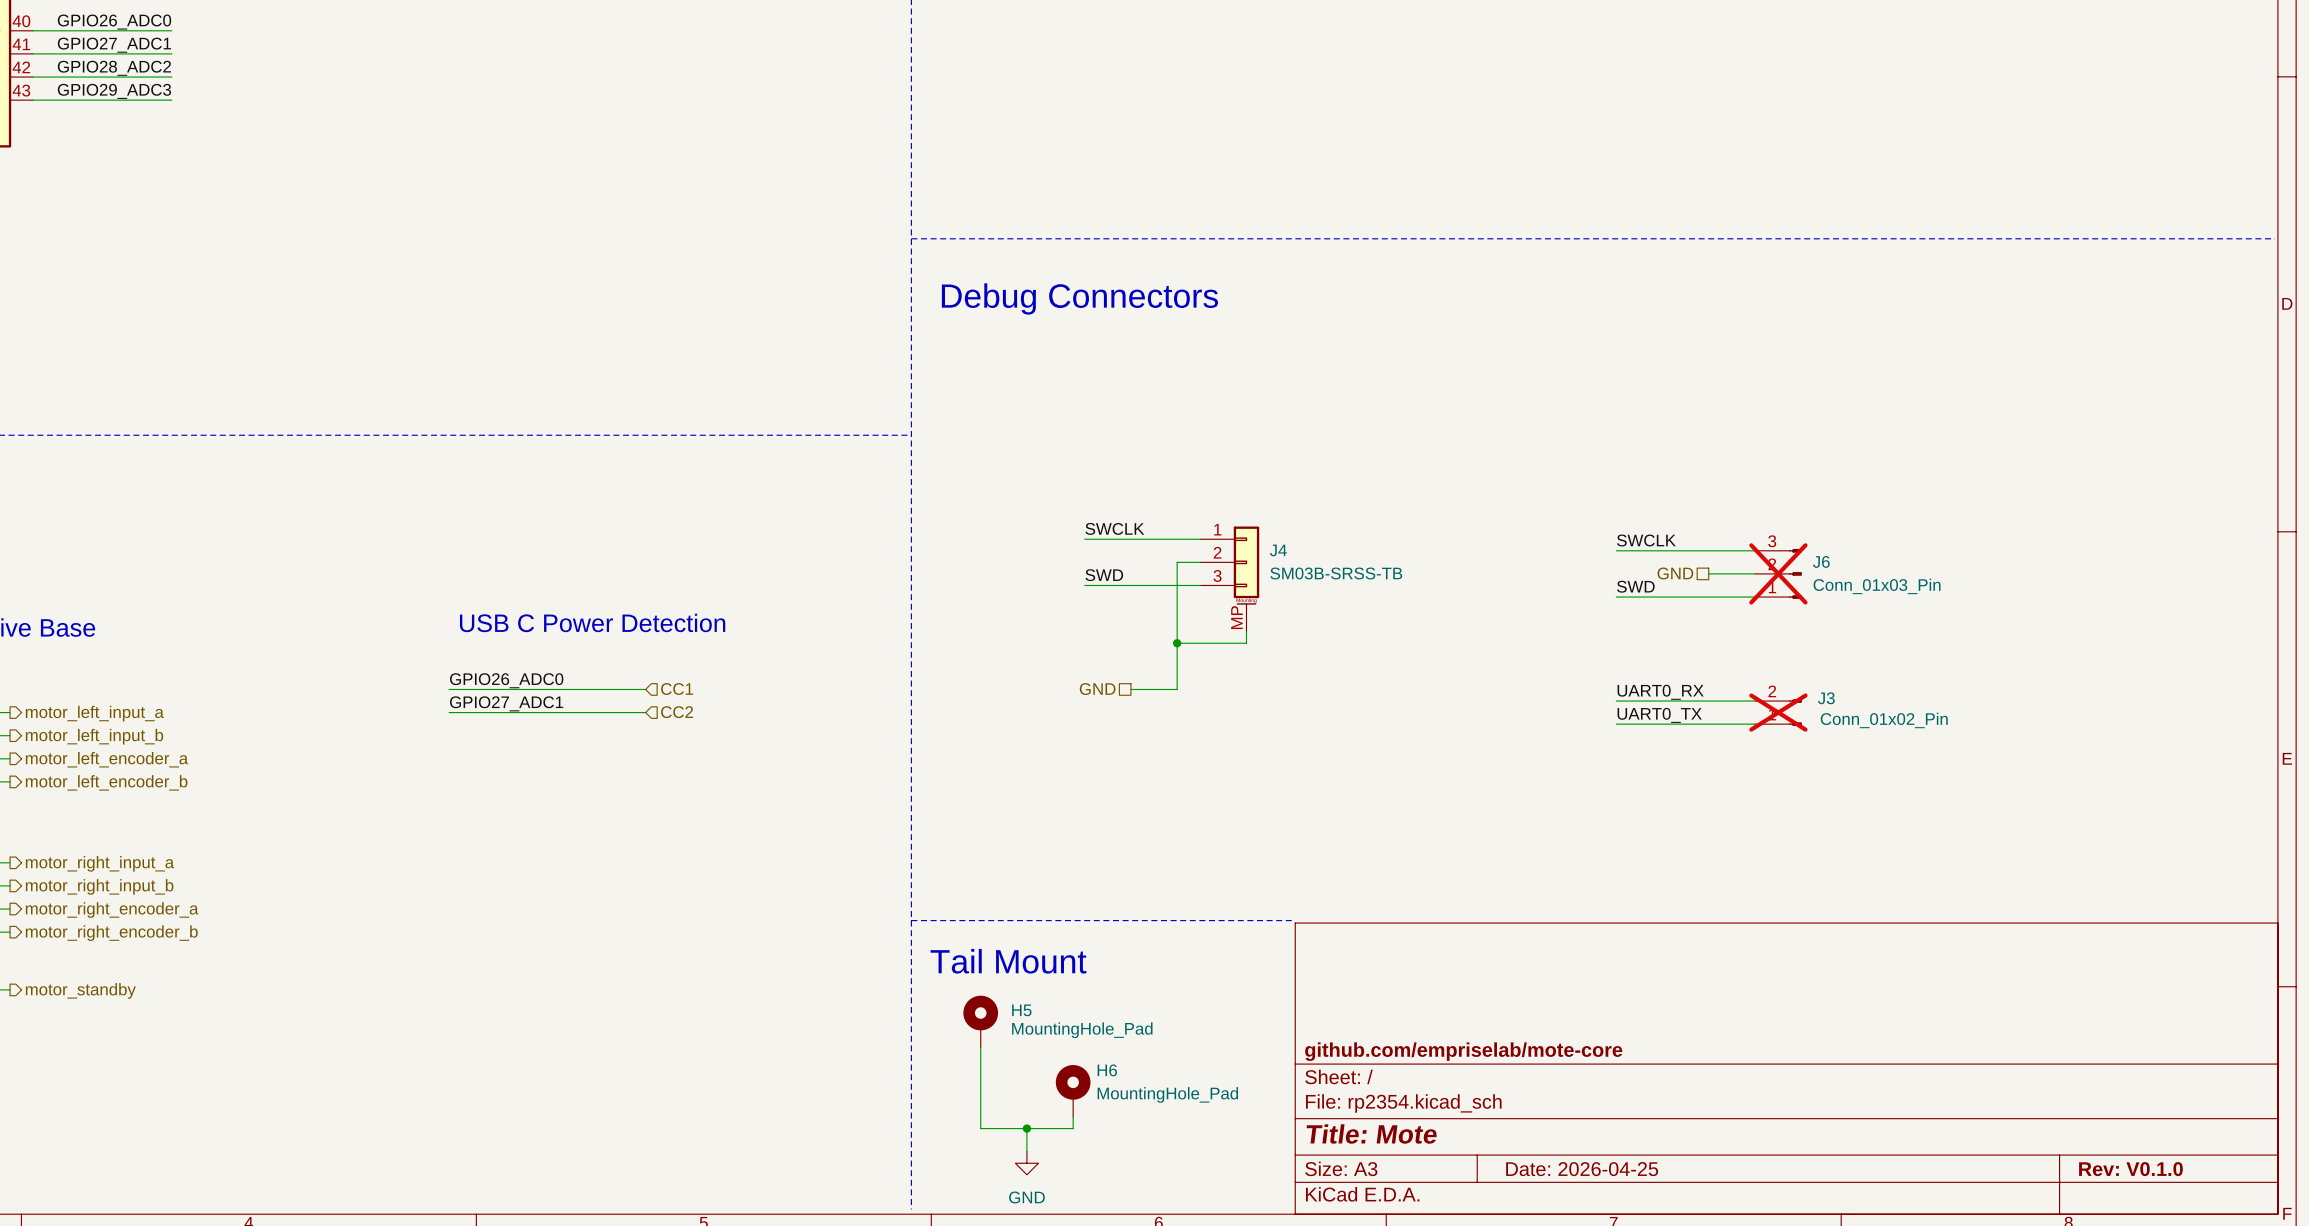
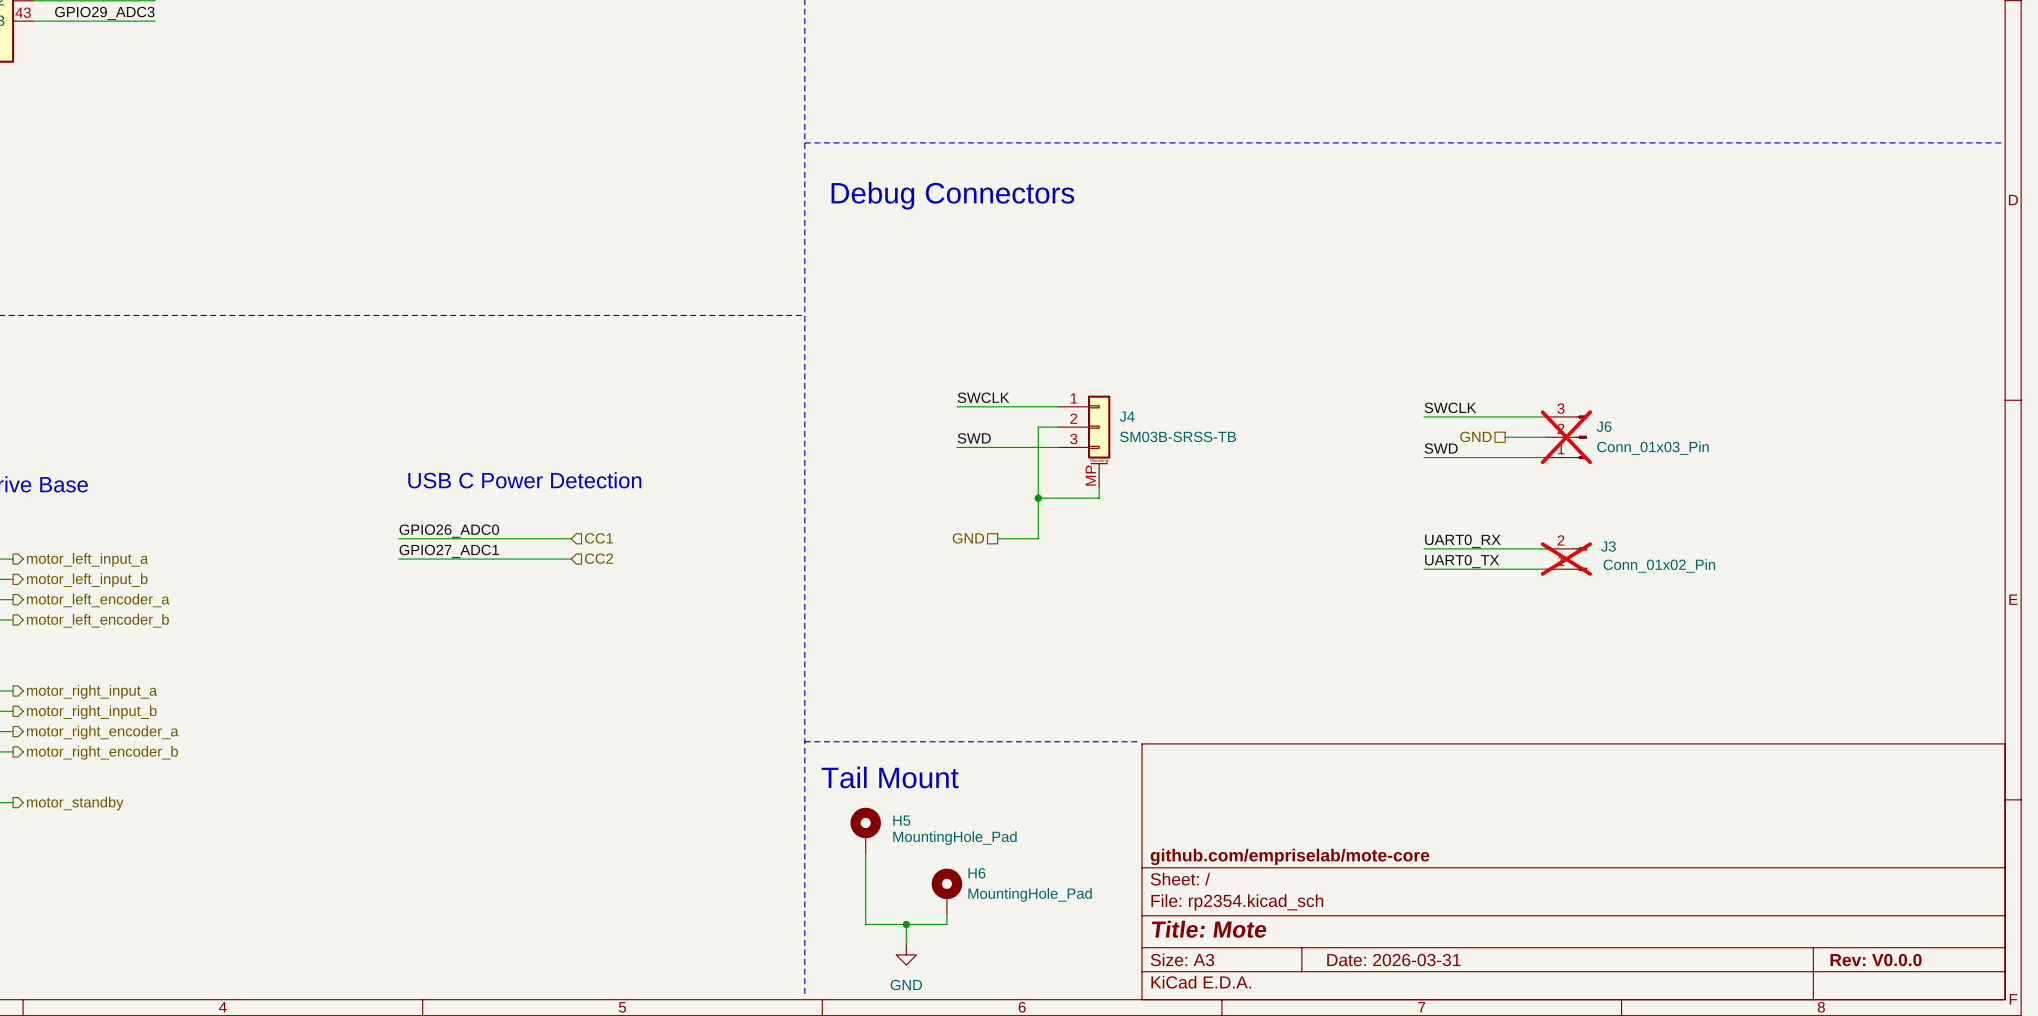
title block: Date: 2026-04-25 (1582, 1169) -> Date: 2026-03-31 (1393, 960)
title block: Rev: V0.1.0 (2130, 1169) -> Rev: V0.0.0 (1876, 960)

